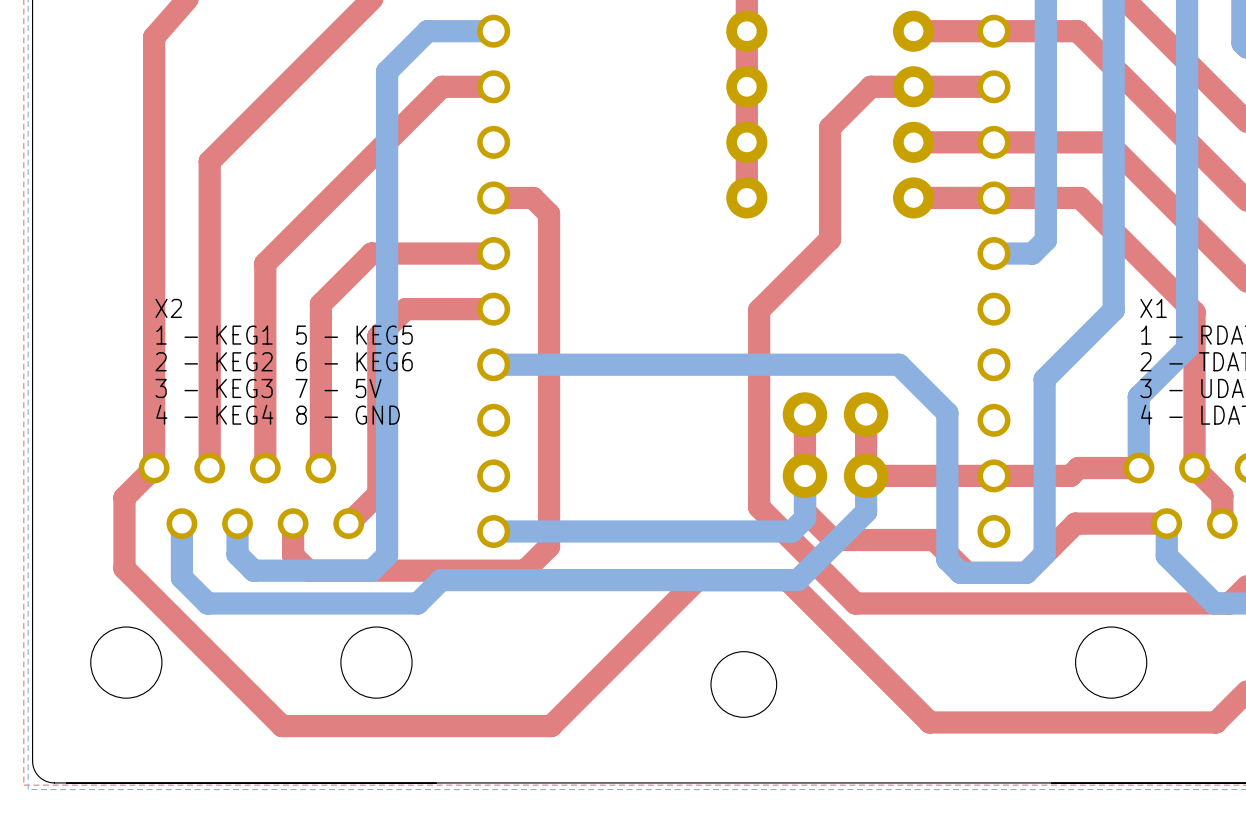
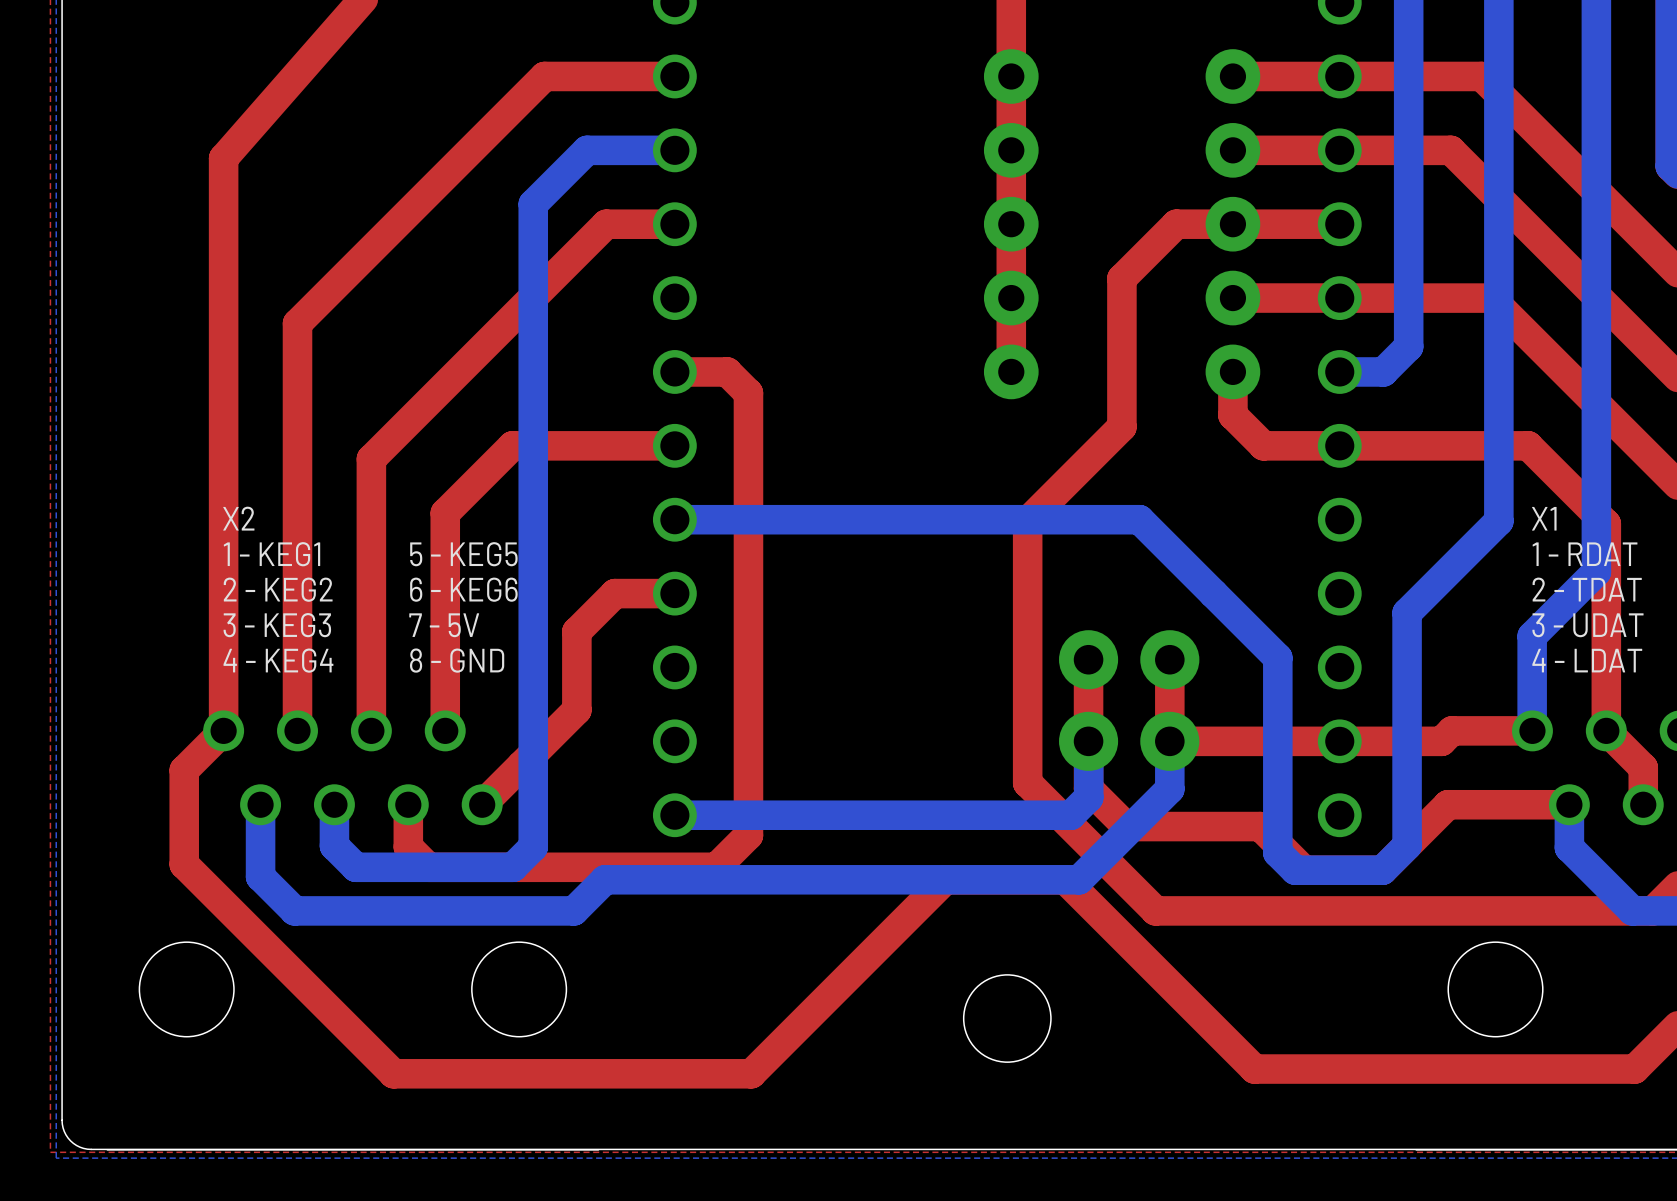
bottom track: (1045, 178) (1045, 240) (1032, 253) (993, 253) -> (1408, 346) (1383, 371) (1339, 371)
top track: (913, 197) (1080, 197) (1135, 253) -> (1232, 371) (1232, 415) (1263, 445) (1528, 445)
top track: (493, 309) (405, 309) (378, 336) (378, 493) -> (674, 593) (614, 593) (576, 631) (576, 710) (521, 765)
bottom track: (899, 364) (493, 364) -> (1213, 593) (1139, 519) (674, 519)

